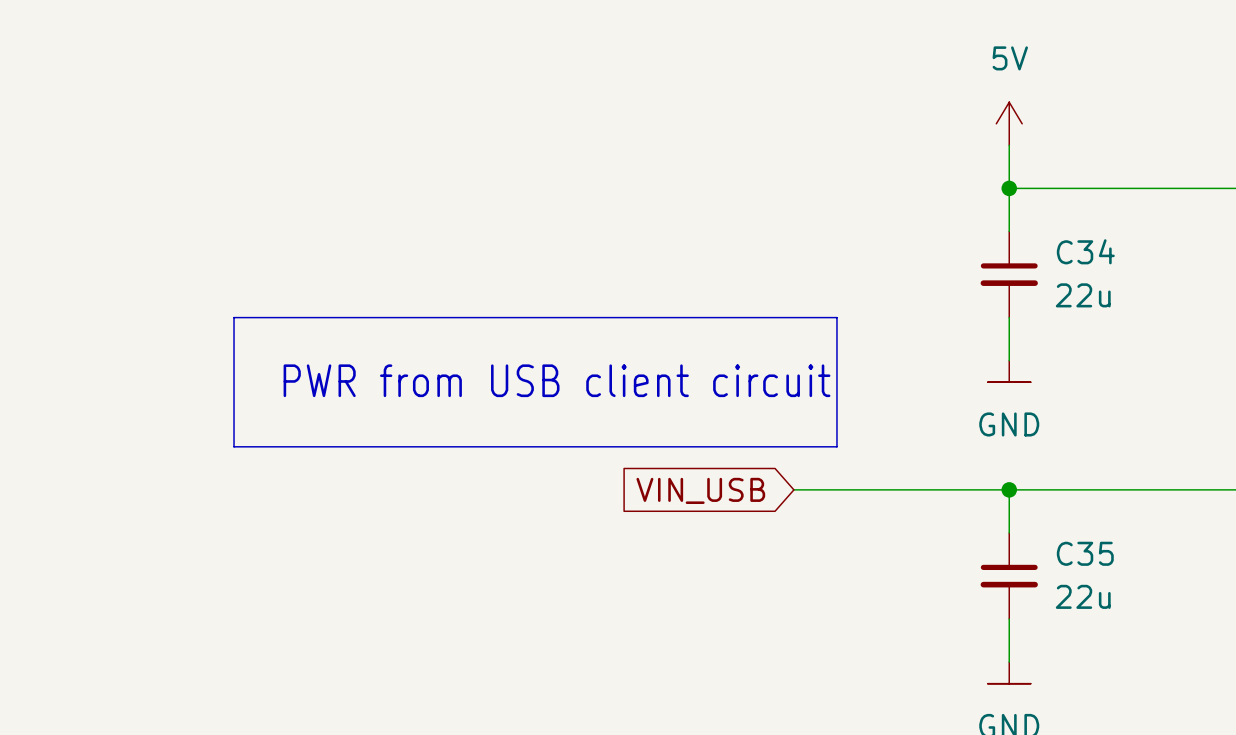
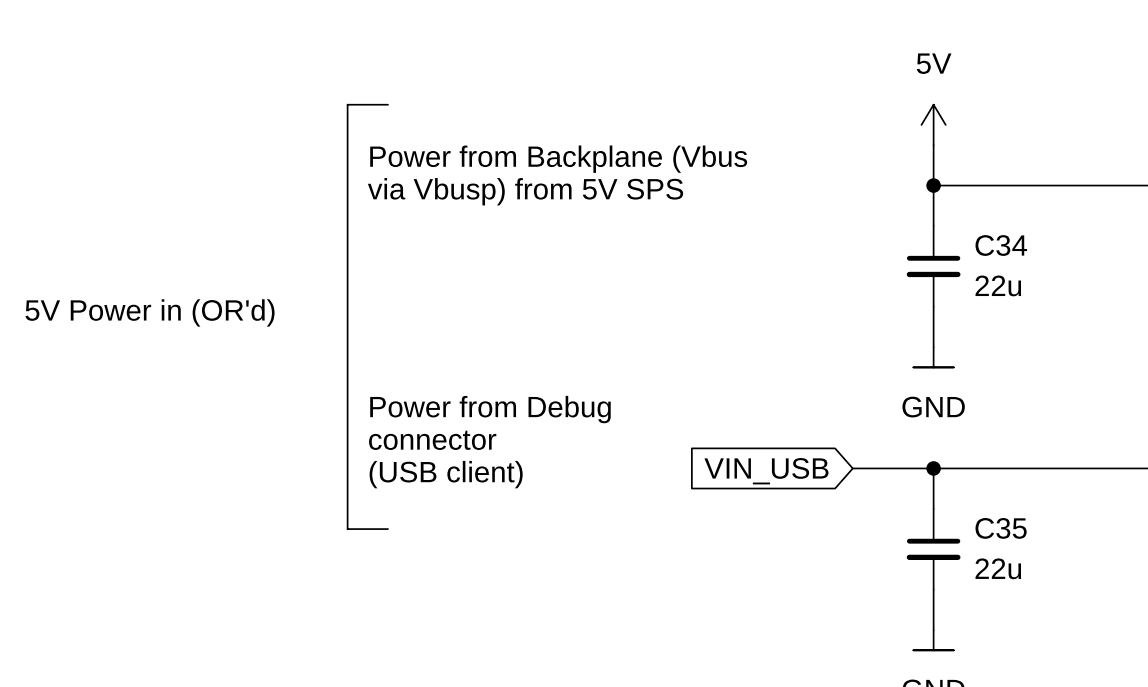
line: none -> (388, 104) (347, 104) (347, 529) (388, 529)
text: none -> Power from Backplane (Vbus (558, 159)
text: none -> via Vbusp) from 5V SPS (525, 191)
line: (234, 317) (836, 317) (836, 446) (234, 446) (234, 317) -> none
text: none -> 5V Power in (OR'd) (150, 312)
text: PWR from USB client circuit (557, 380) -> none
text: none -> Power from Debug (490, 409)
text: none -> connector (432, 440)
wire: (793, 489) (923, 489) -> none
global label position: VIN_USB (700, 490) -> VIN_USB (766, 471)
text: none -> (USB client) (446, 474)

